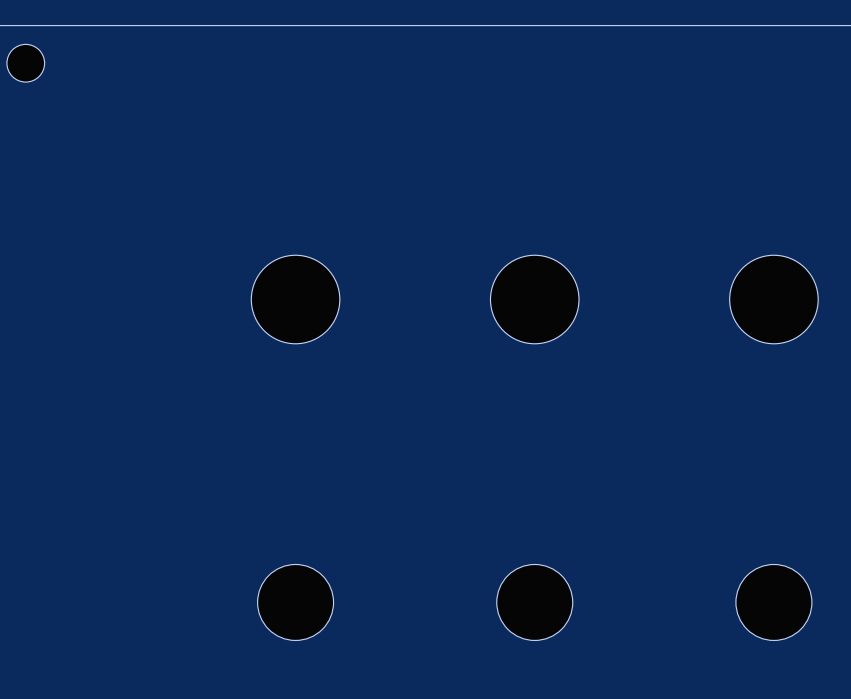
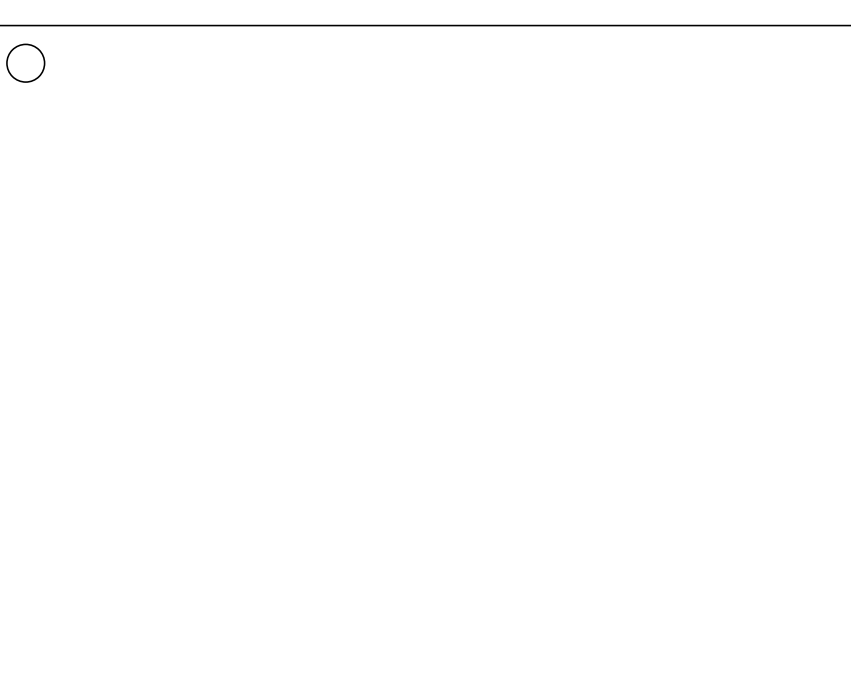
hole: (295, 299) -> none
hole: (534, 299) -> none
hole: (773, 299) -> none
hole: (295, 602) -> none
hole: (534, 602) -> none
hole: (773, 602) -> none

